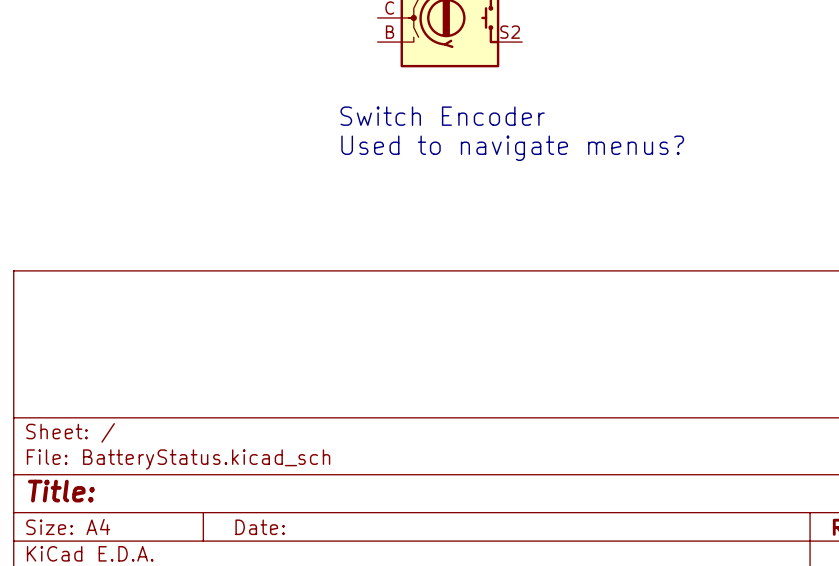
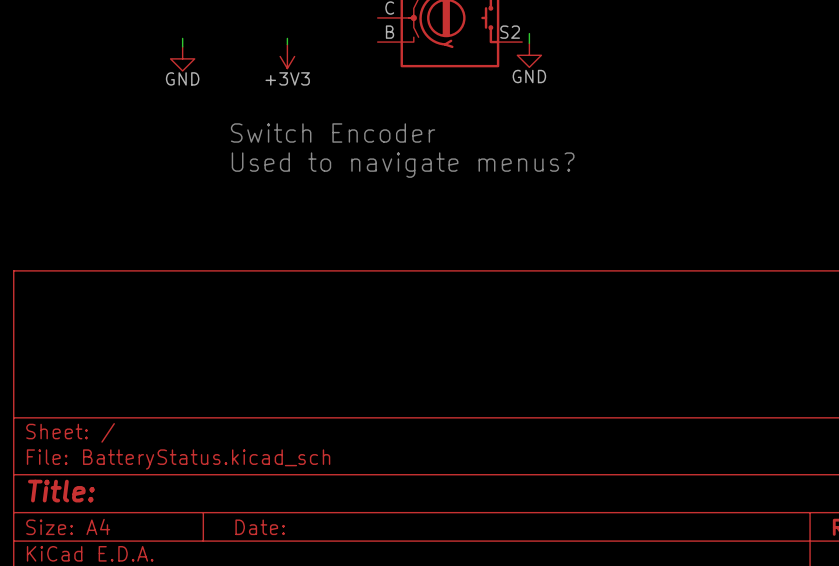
wire: none -> (529, 33) (529, 43)
wire: none -> (182, 38) (182, 46)
wire: none -> (287, 38) (287, 44)
power symbol: none -> GND (529, 55)
power symbol: none -> +3V3 (287, 56)
power symbol: none -> GND (182, 58)
text position: Switch Encoder (442, 116) -> Switch Encoder (333, 133)
text position: Used to navigate menus? (512, 148) -> Used to navigate menus? (403, 165)

